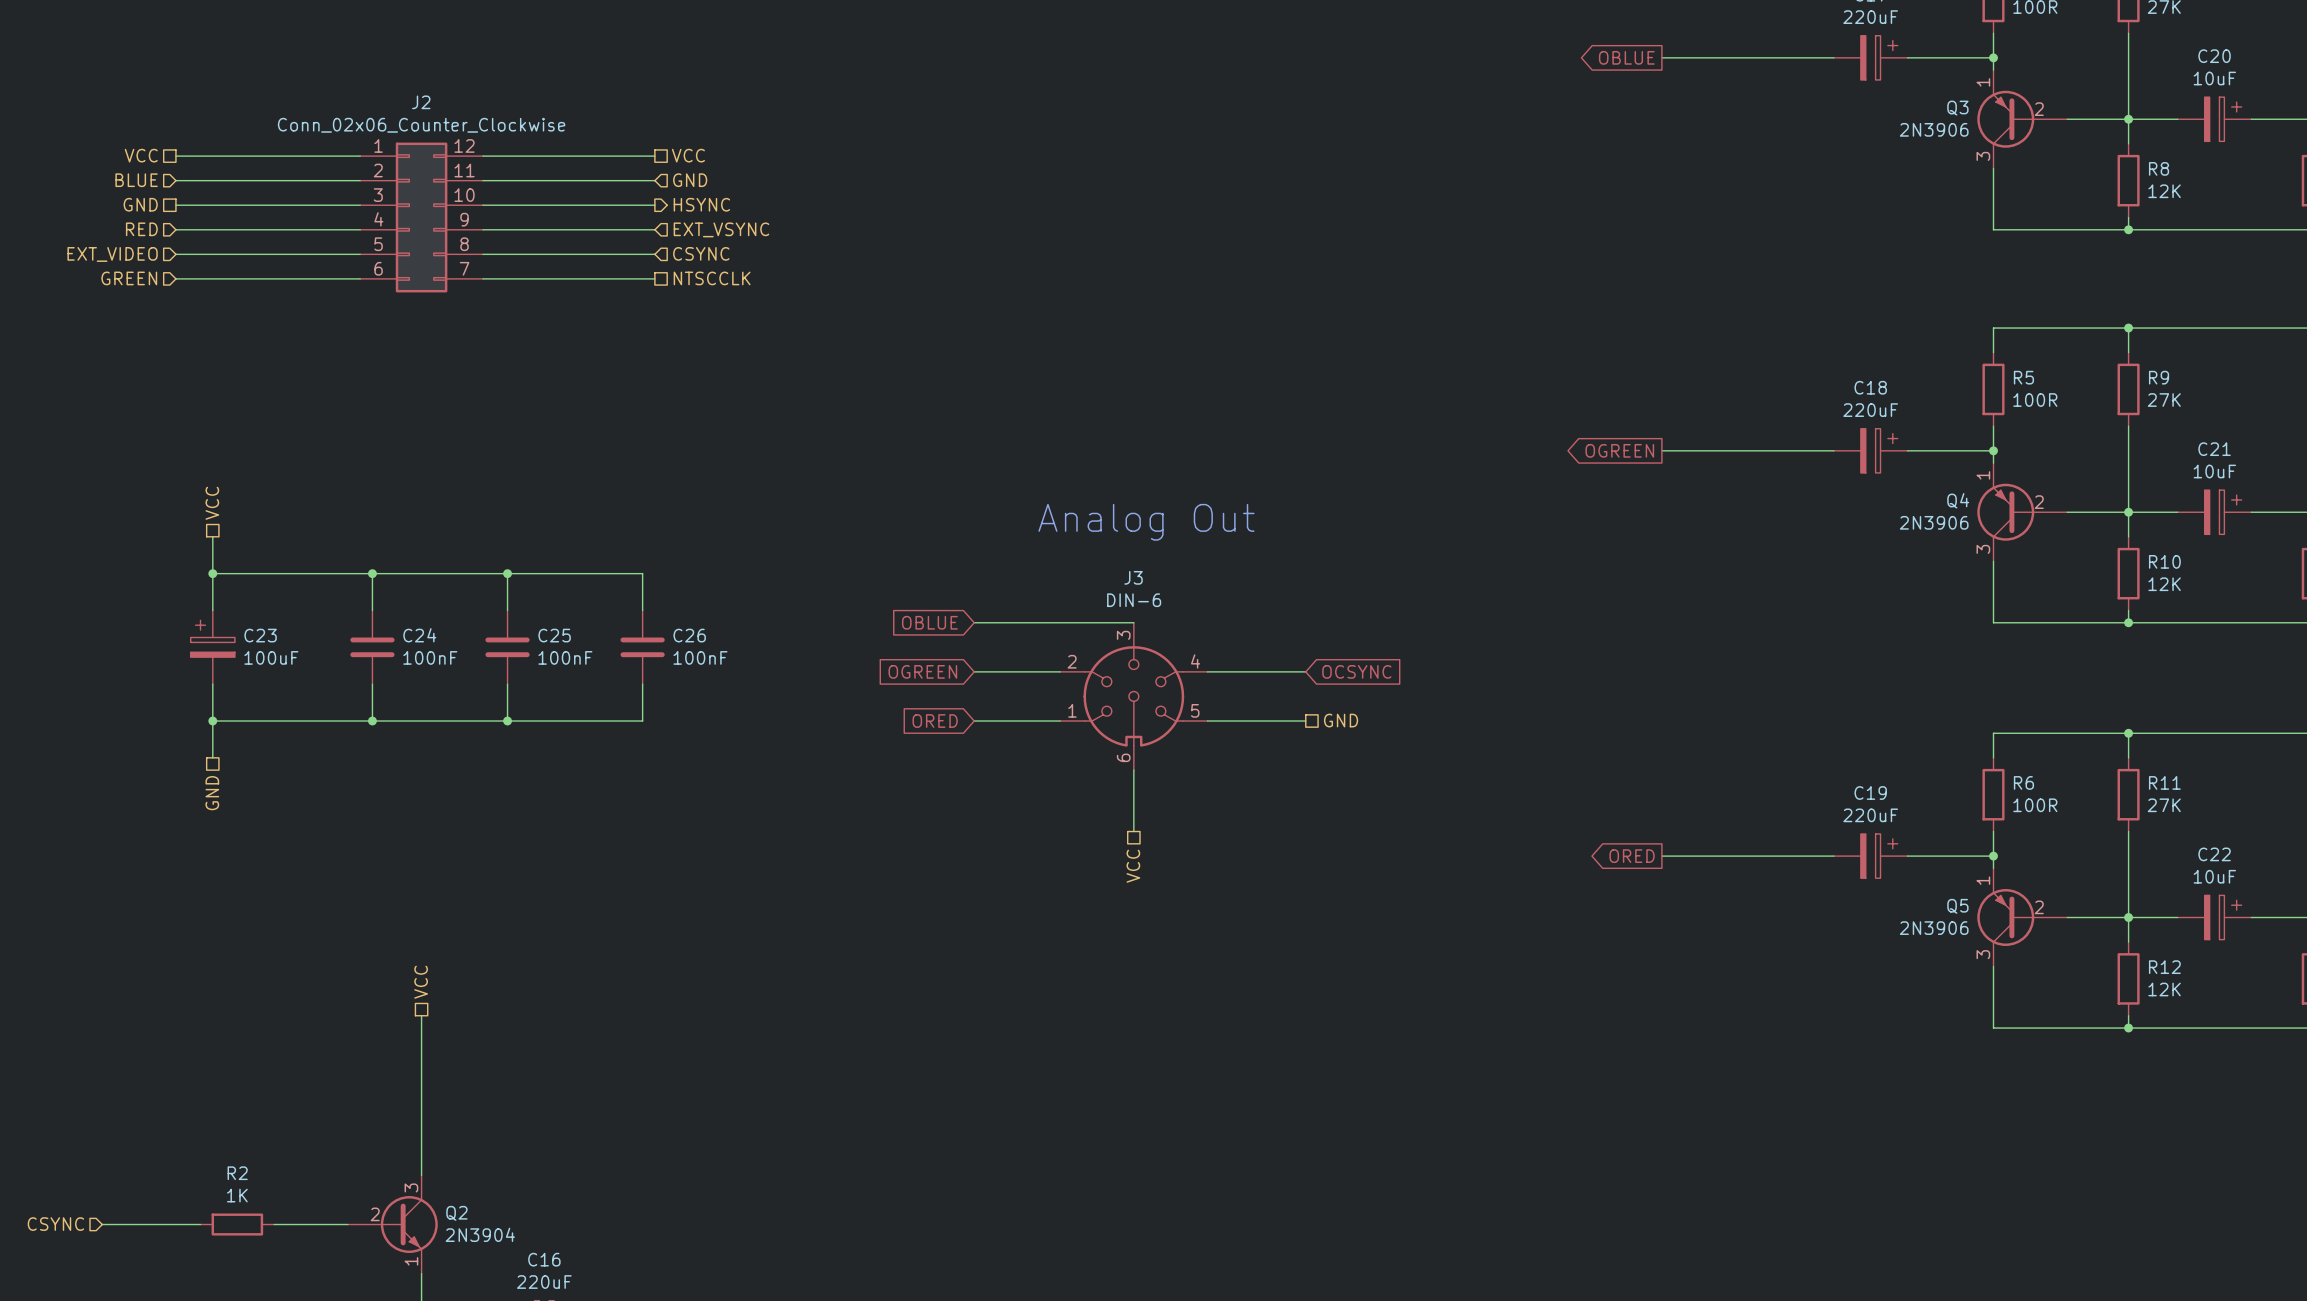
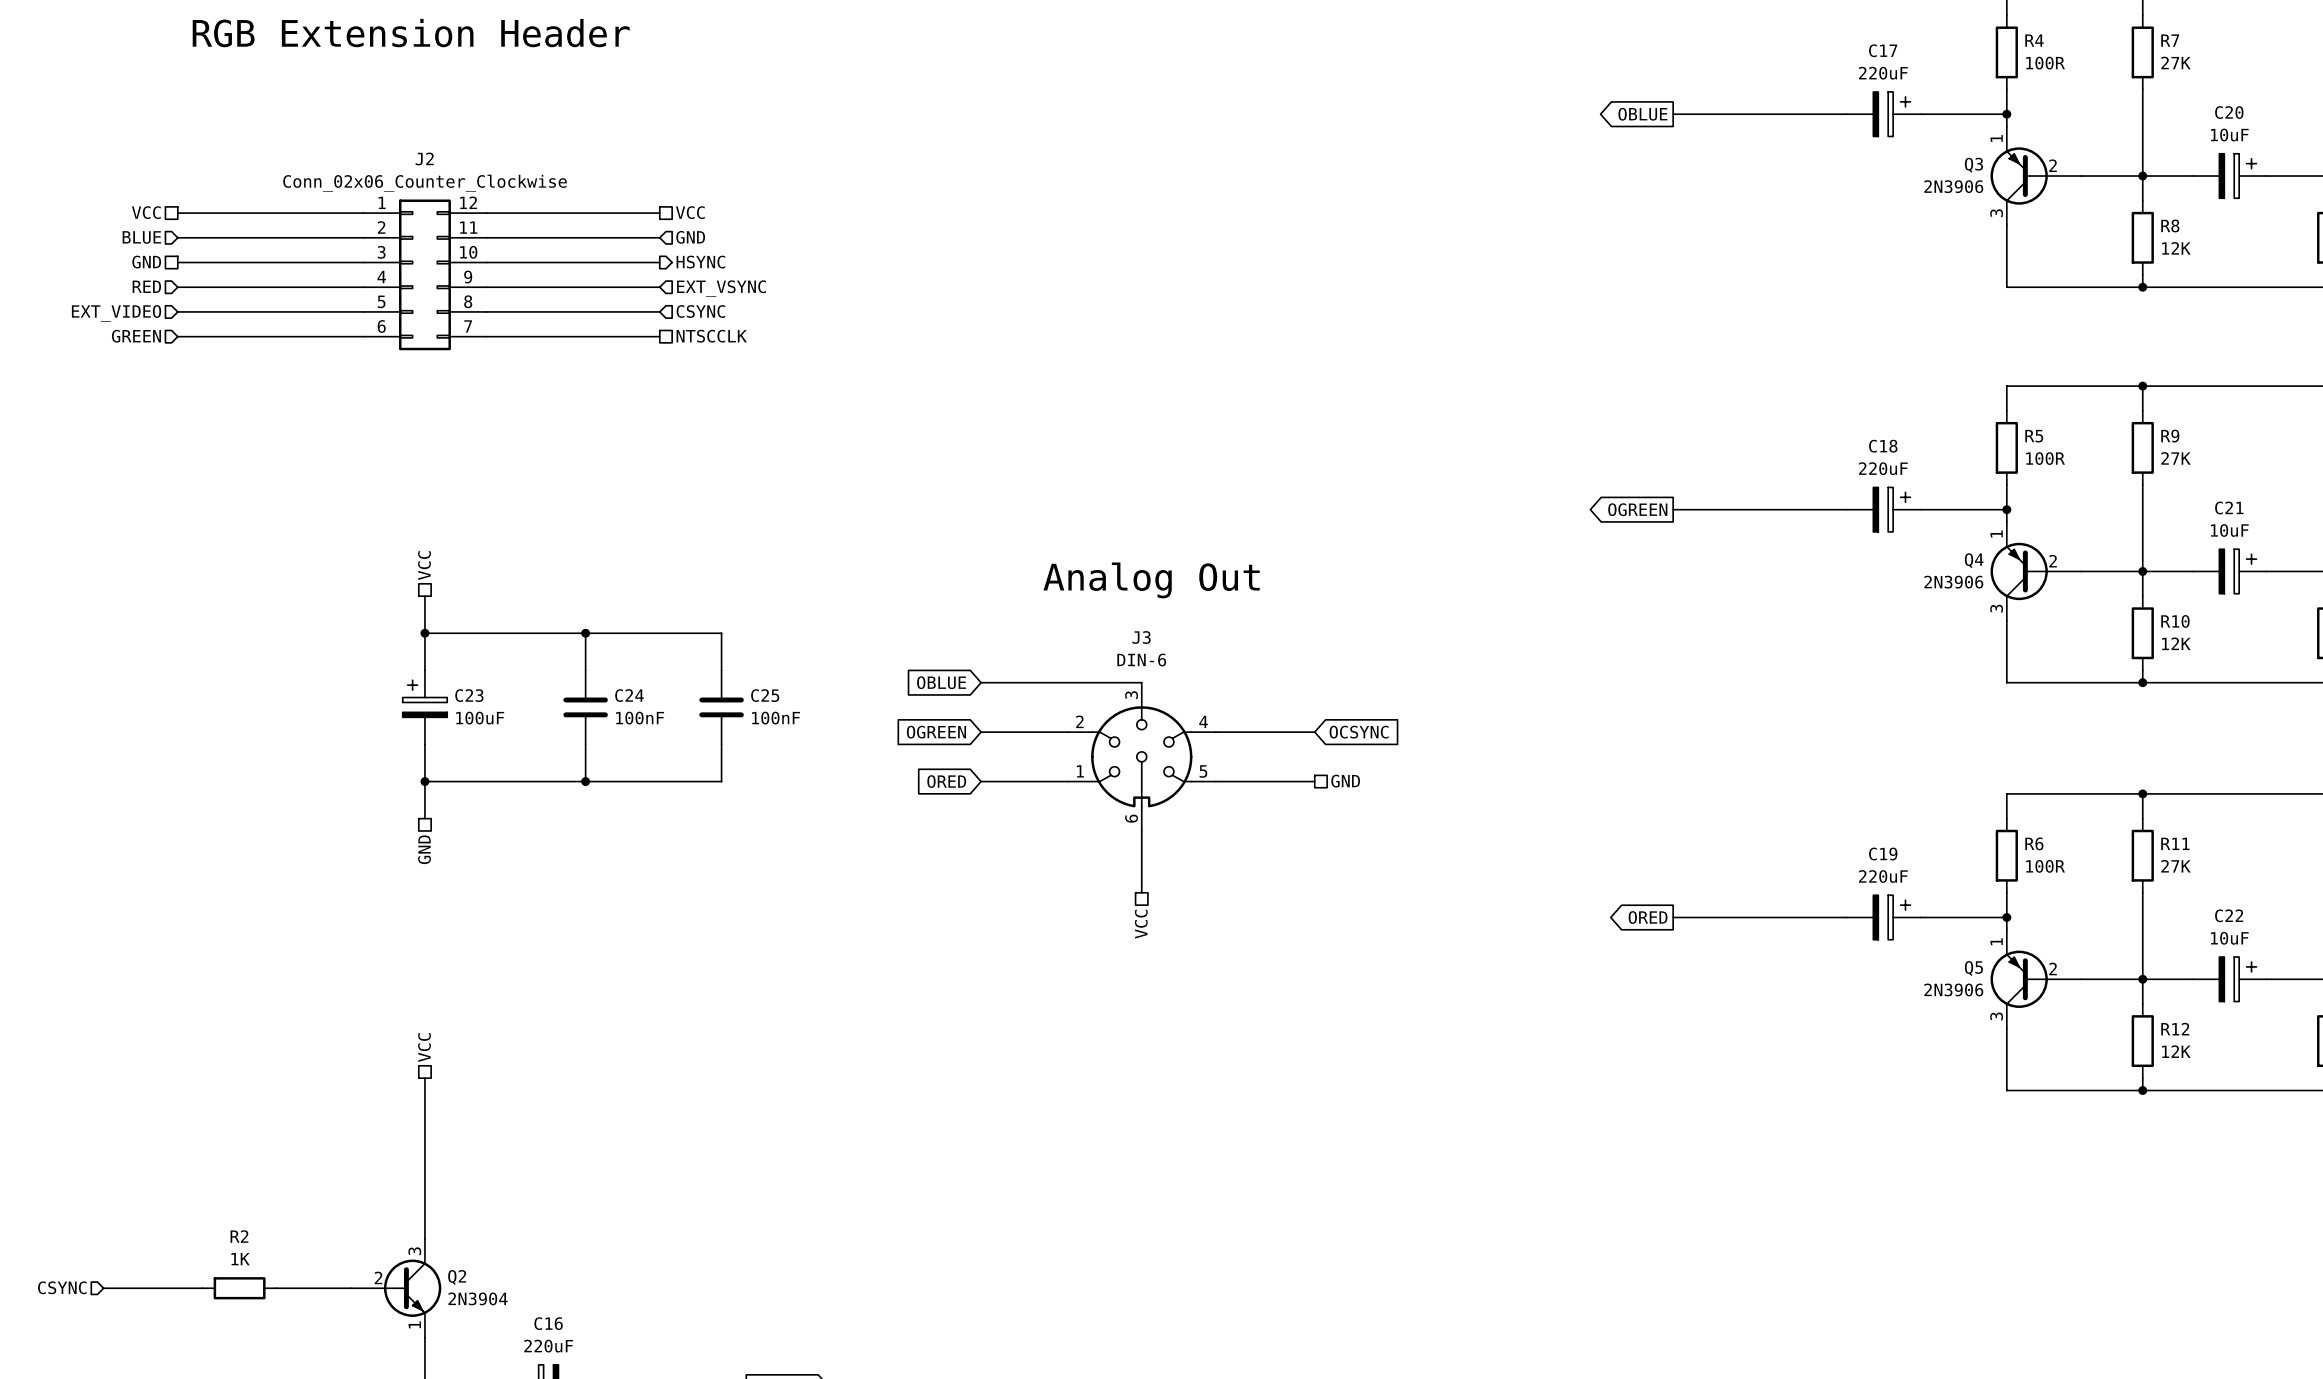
hierarchical label position: VCC (212, 503) -> VCC (424, 565)
wire: (212, 536) (212, 610) -> (424, 596) (424, 670)
wire: (212, 573) (421, 573) -> none
junction: (212, 573) -> none
wire: (372, 573) (372, 610) -> (585, 633) (585, 670)
junction: (372, 573) -> none
junction: none -> (424, 633)
wire: (507, 573) (507, 610) -> none
junction: (507, 573) -> none
junction: none -> (585, 633)
wire: (642, 573) (642, 610) -> (647, 633) (721, 633) (721, 670)
C23 position: (212, 647) -> (424, 707)
C24 position: (372, 647) -> (585, 707)
C25 position: (507, 647) -> (721, 707)
C26: 100nF (642, 647) -> none
wire: (212, 684) (212, 757) -> (424, 744) (424, 818)
wire: (372, 684) (372, 721) -> (585, 744) (585, 781)
wire: (507, 684) (507, 721) -> none
wire: (642, 684) (642, 721) -> (721, 744) (721, 781) (647, 781)
wire: (212, 721) (421, 721) -> none
junction: (212, 721) -> none
junction: (372, 721) -> none
junction: none -> (424, 781)
junction: (507, 721) -> none
junction: none -> (585, 781)
hierarchical label position: GND (212, 793) -> GND (424, 849)

